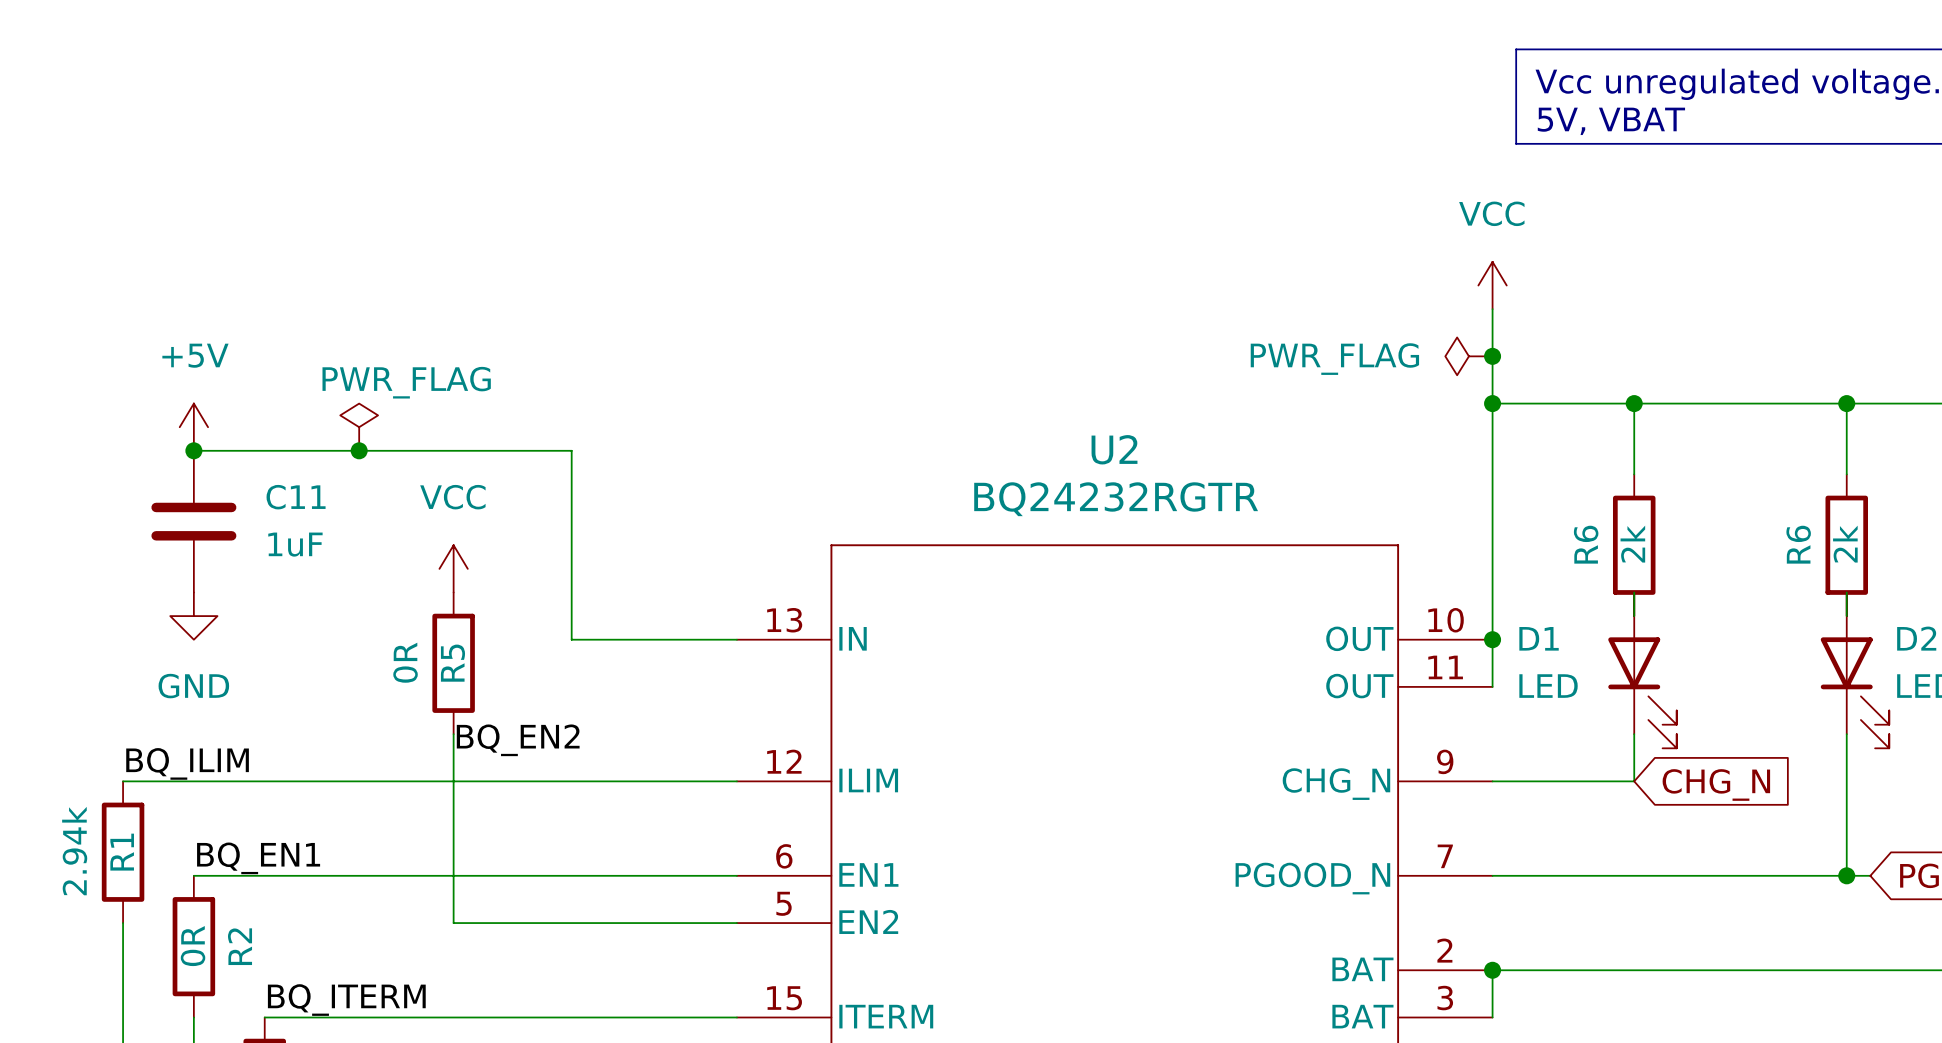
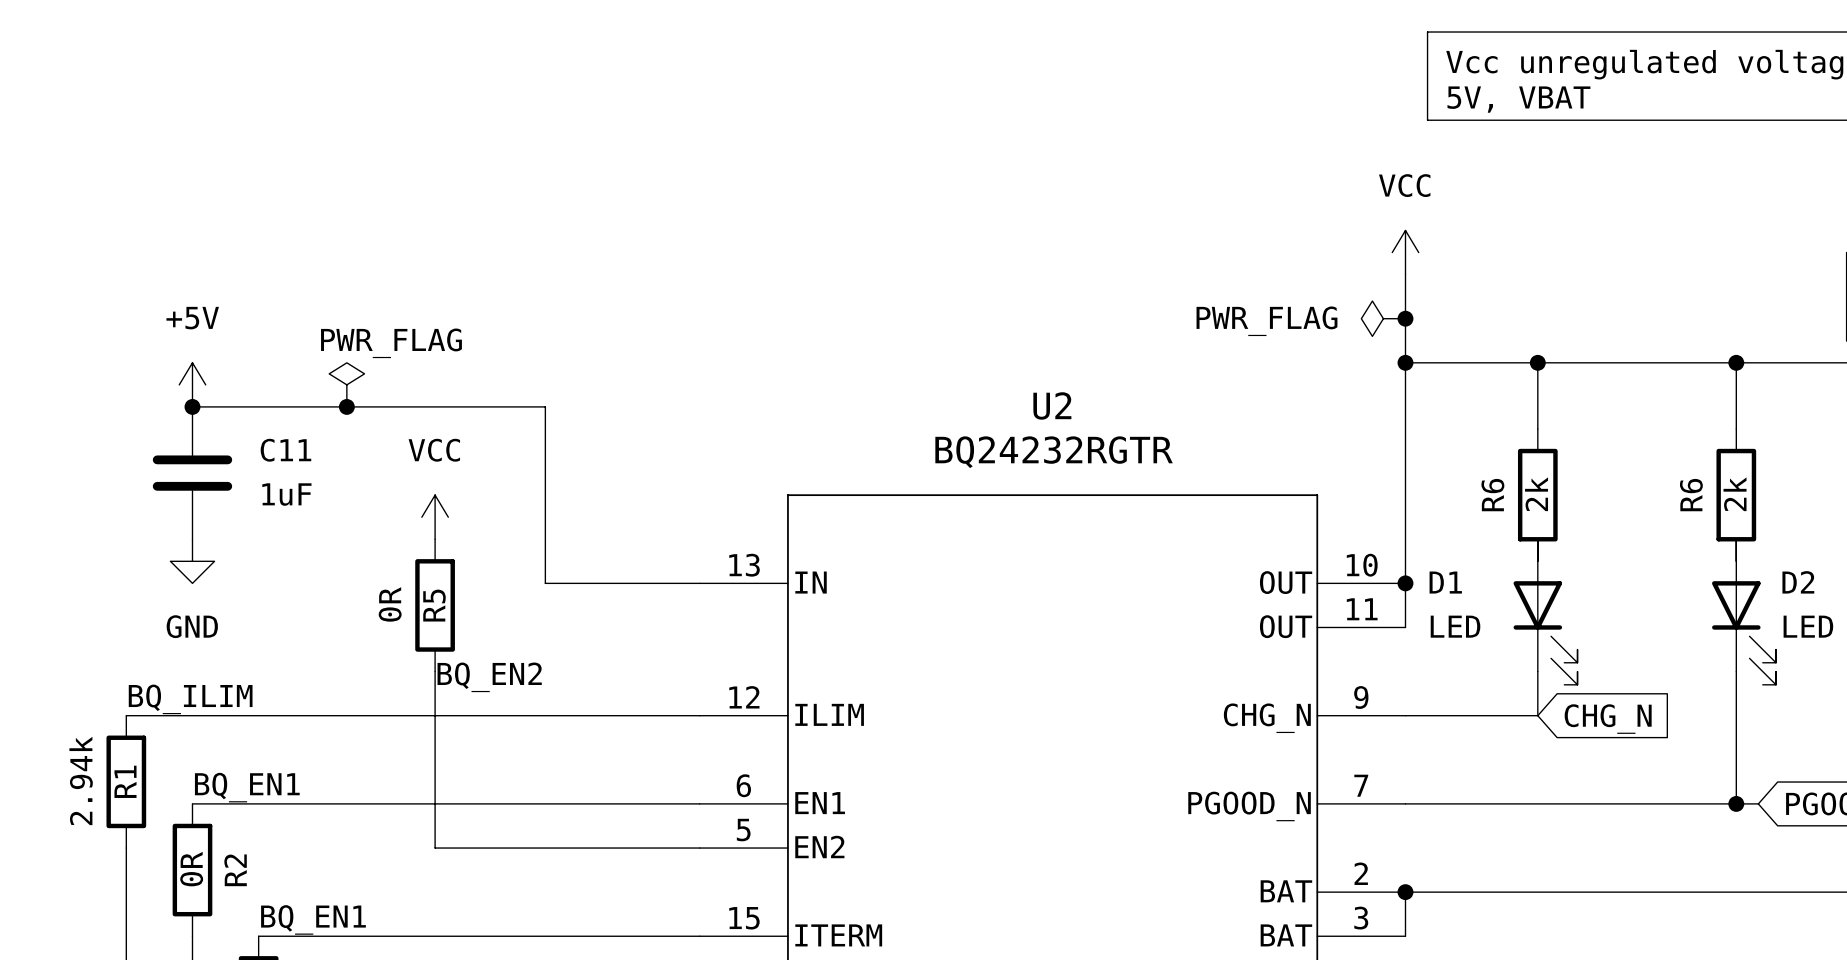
label: BQ_ITERM (346, 1000) -> BQ_EN1 (313, 919)

